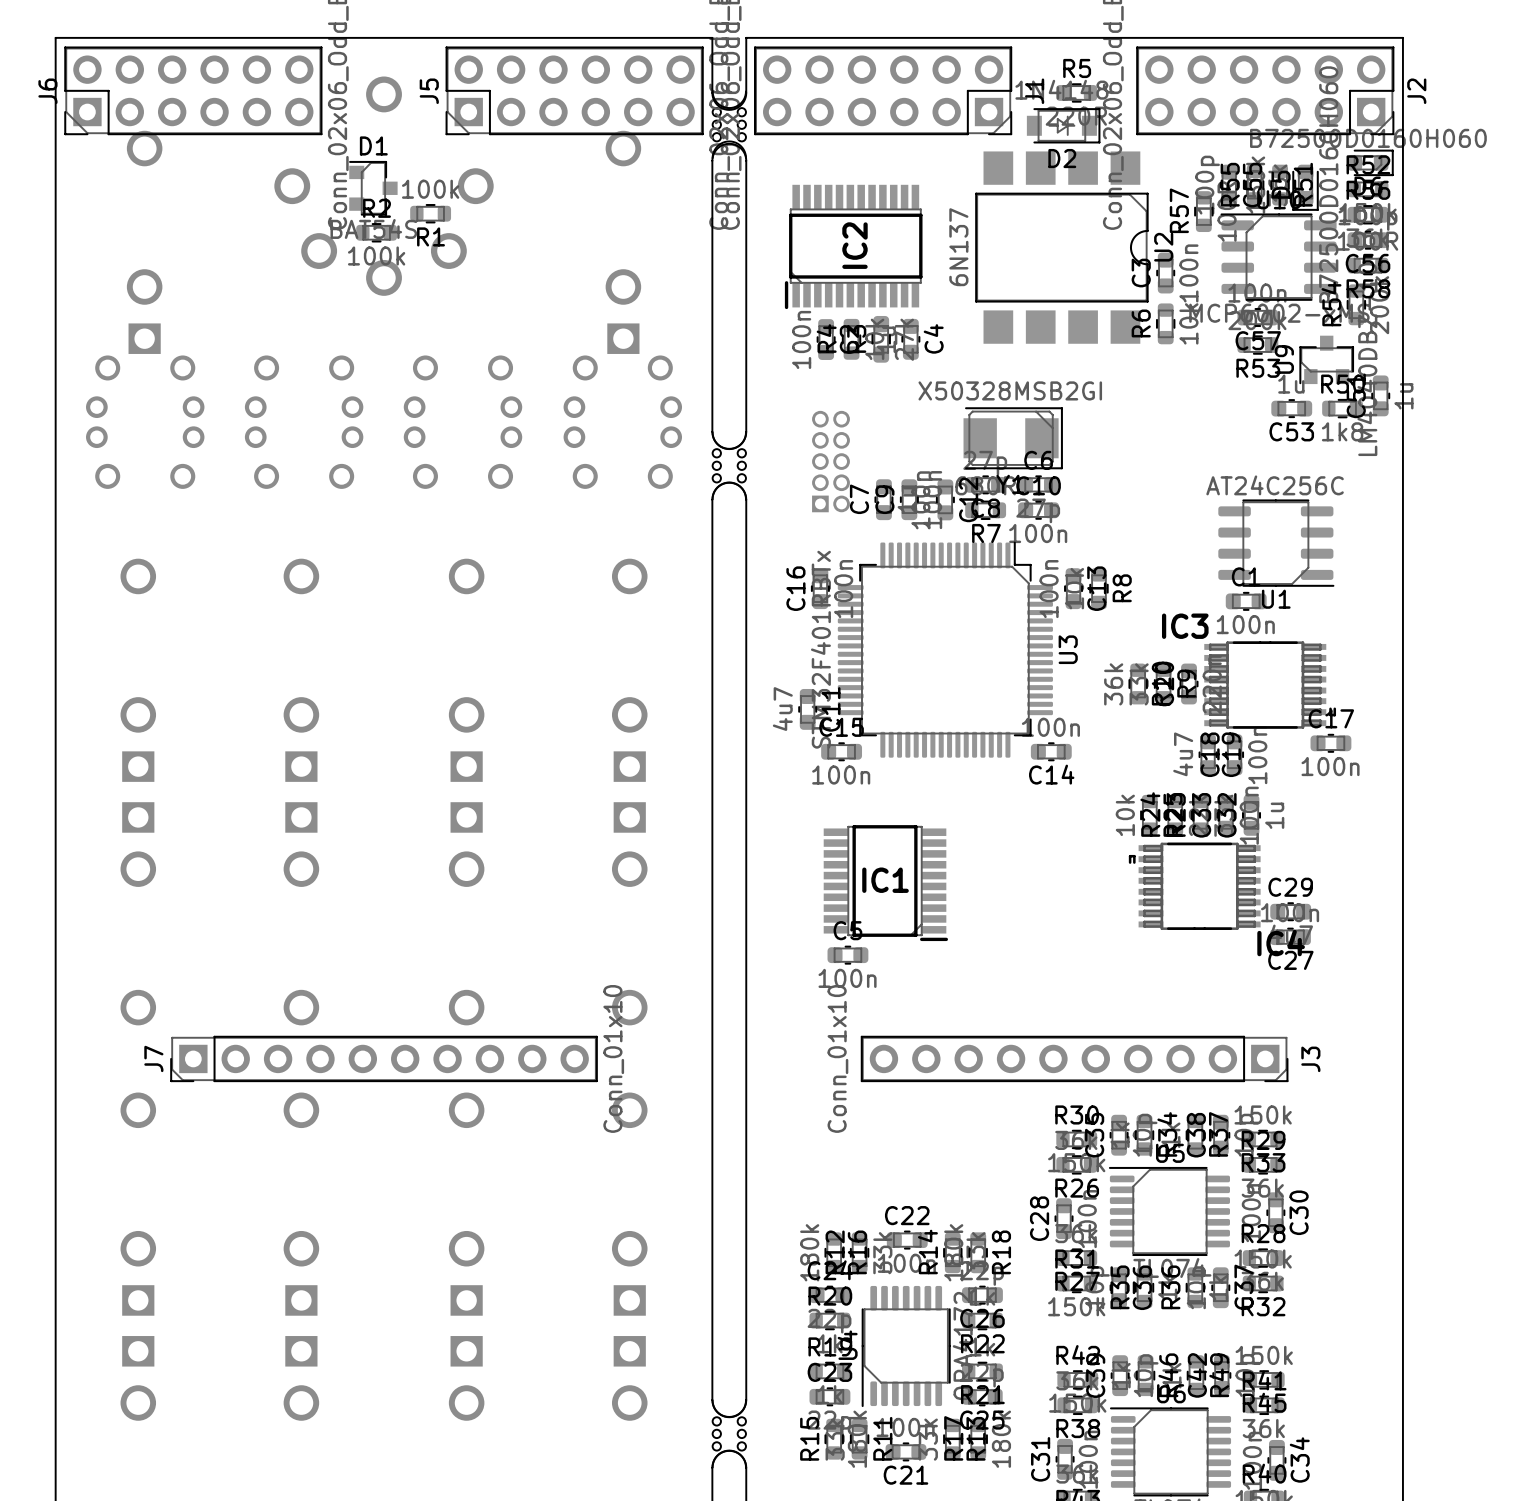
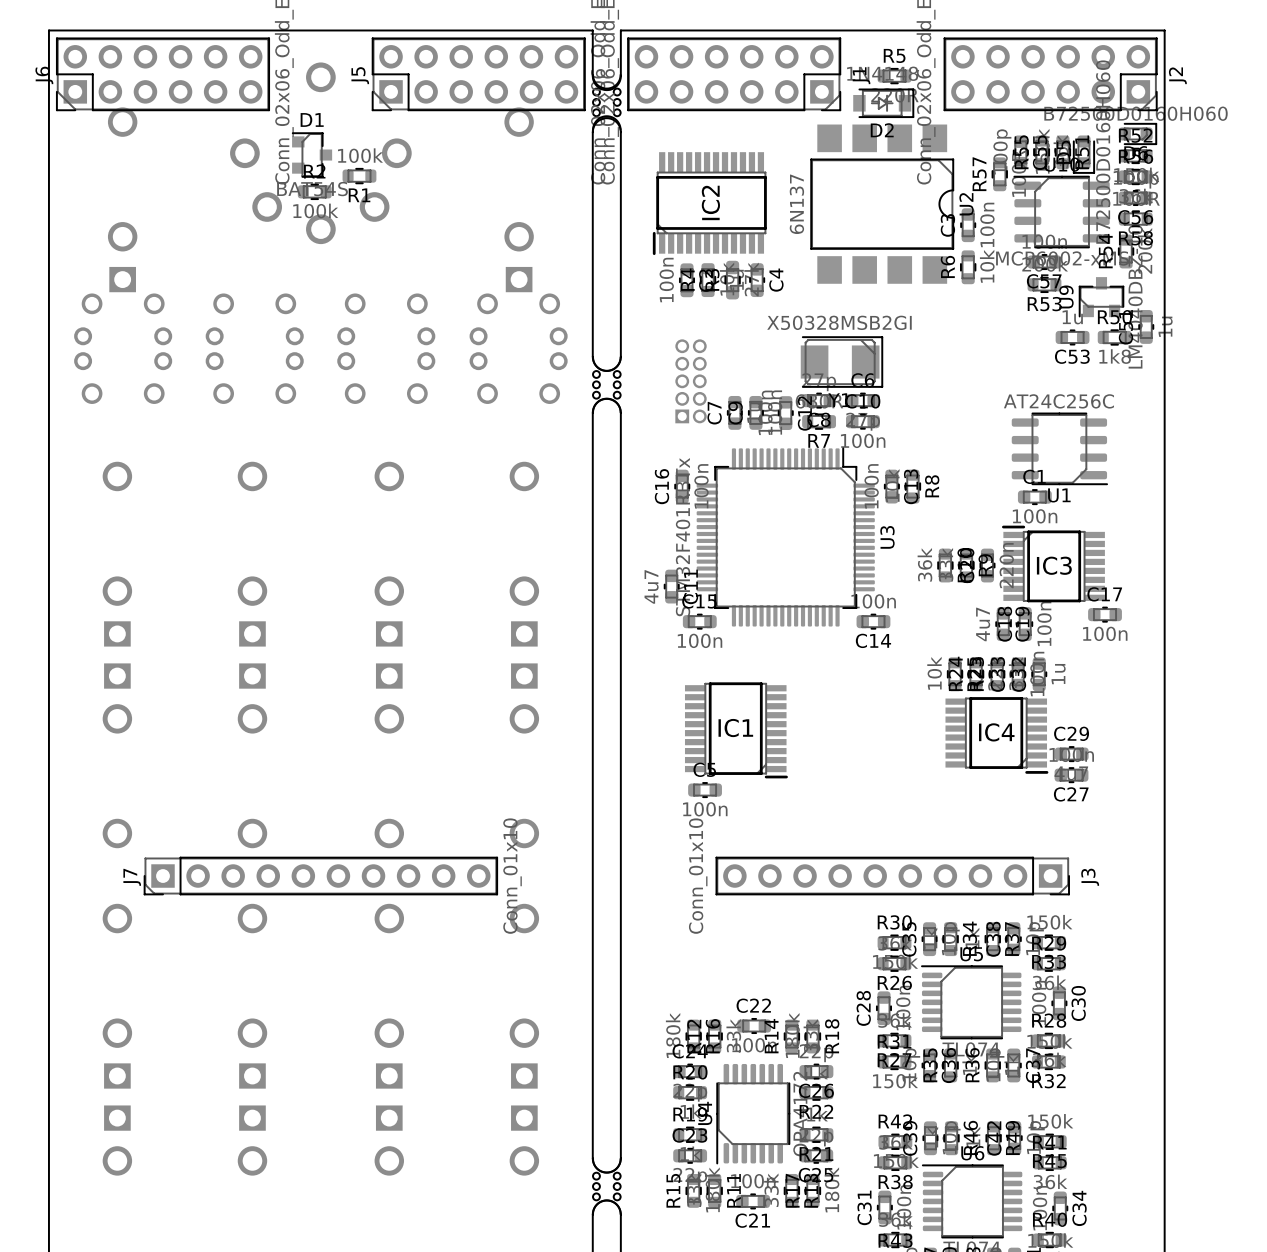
IC3 name position: IC3 (1185, 626) -> IC3 (1054, 565)
IC3 footprint: [1204, 641, 1337, 729] -> [1002, 525, 1105, 603]
IC4 footprint: [1128, 842, 1261, 930] -> [945, 697, 1049, 774]
IC4 name position: IC4 (1281, 943) -> IC4 (996, 732)

